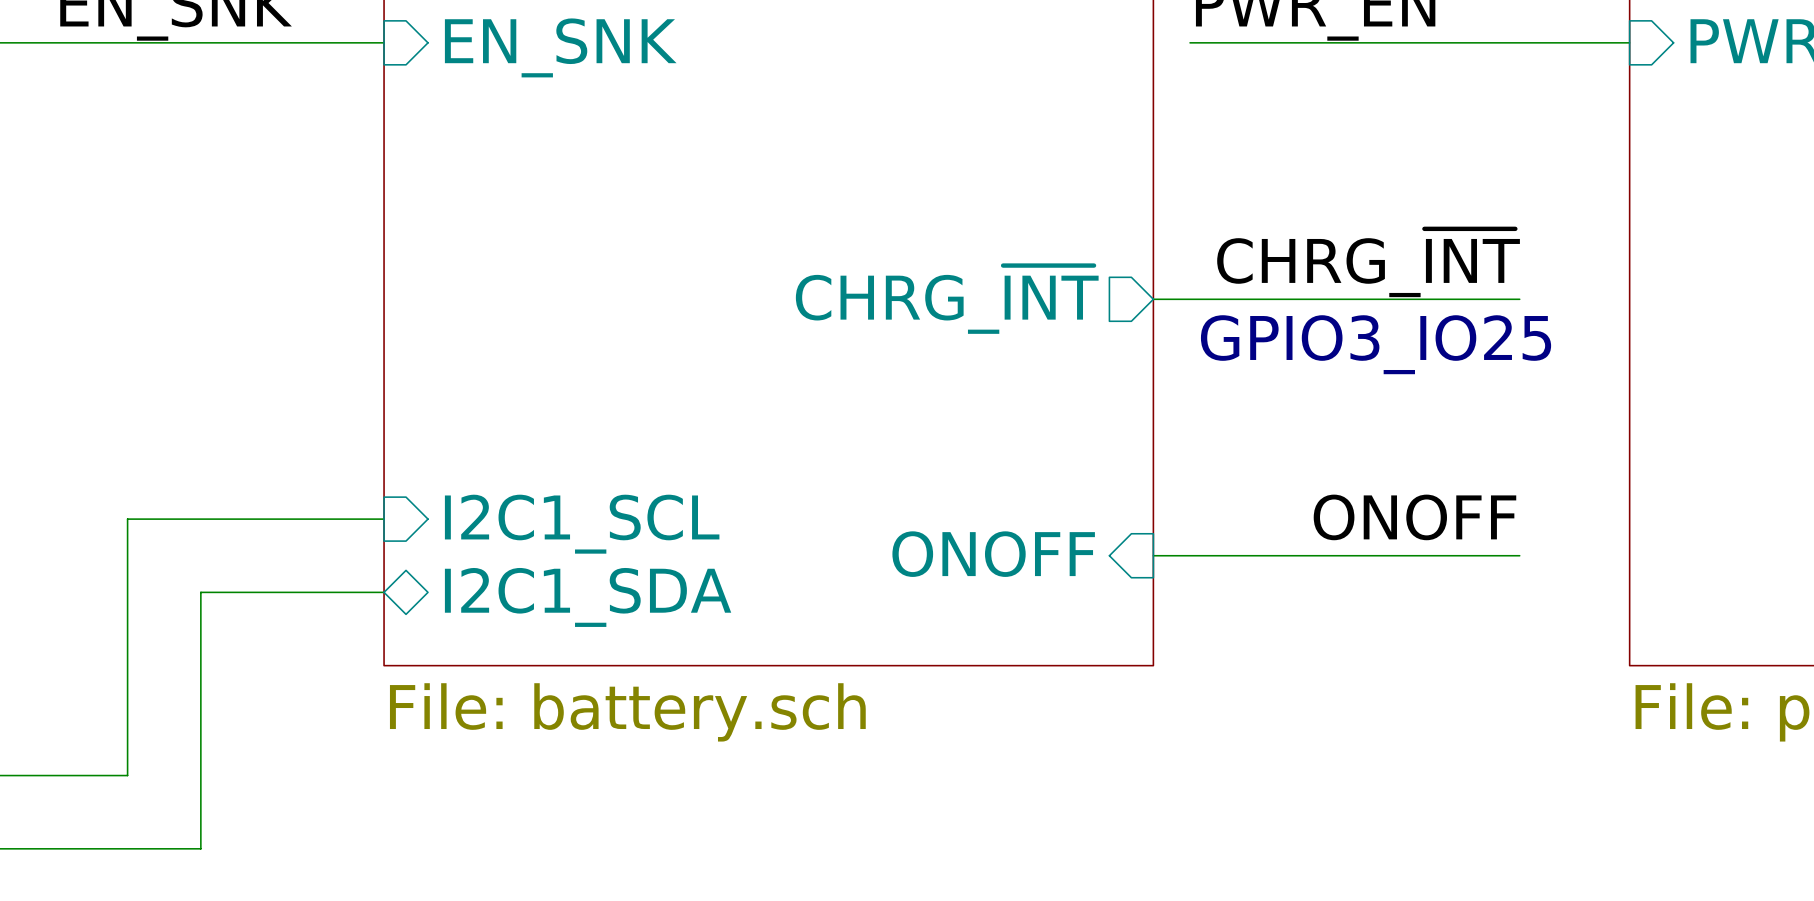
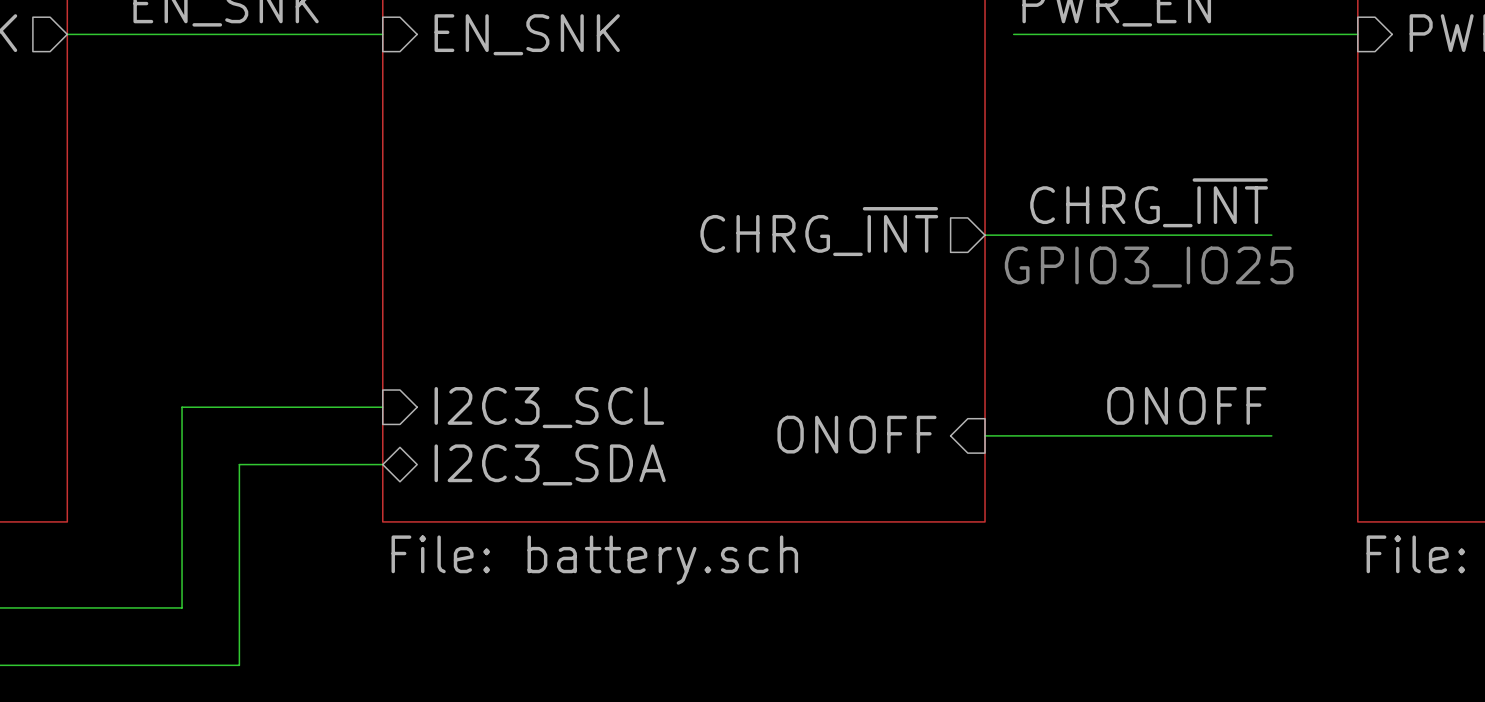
sheet pin: I2C1_SCL (582, 524) -> I2C3_SCL (549, 407)
sheet pin: I2C1_SDA (588, 597) -> I2C3_SDA (550, 464)

